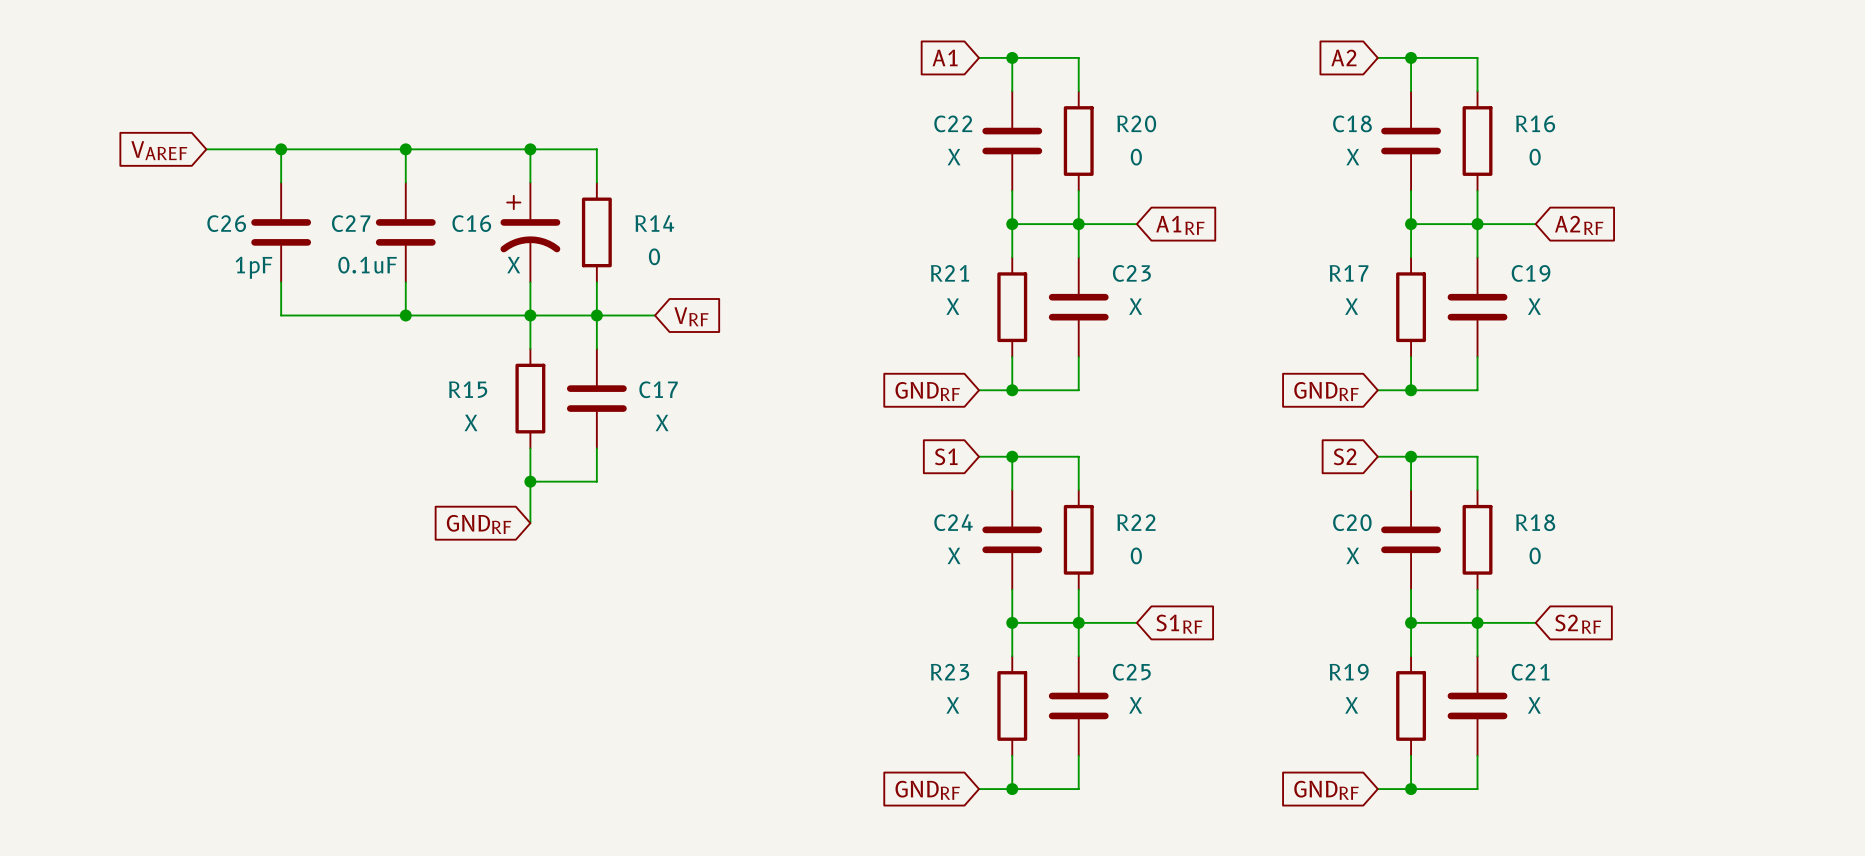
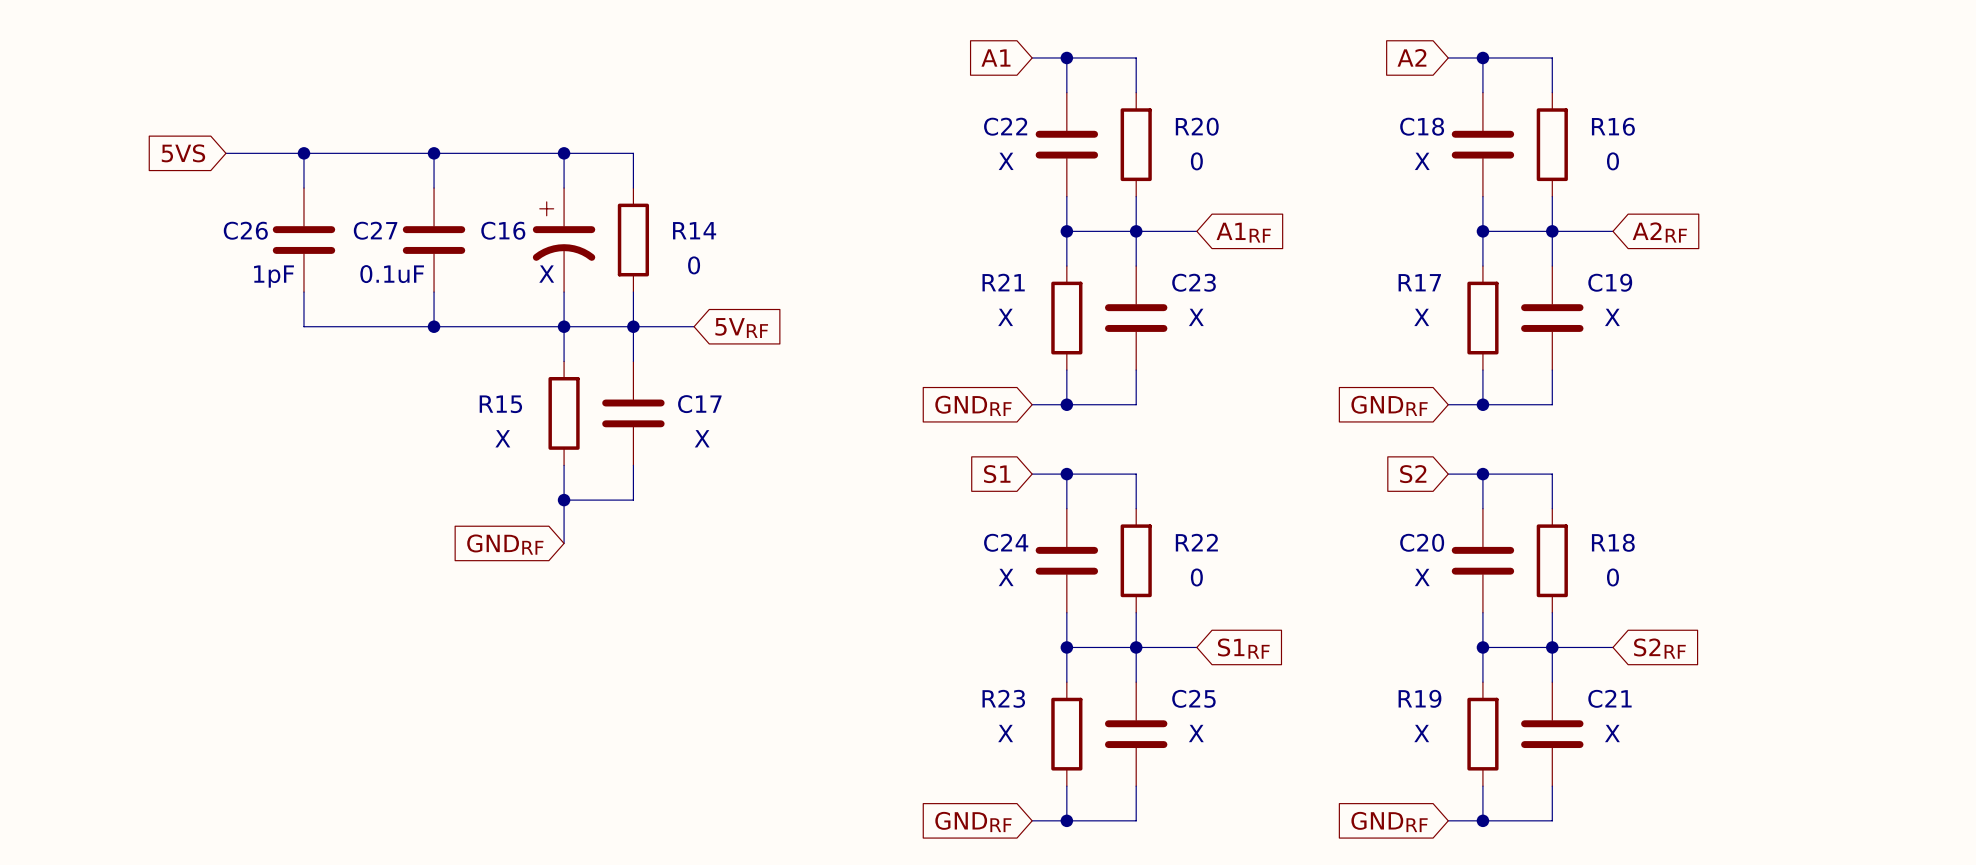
global label: VAREF (159, 150) -> 5VS (183, 153)
global label: VRF (691, 316) -> 5VRF (741, 328)

